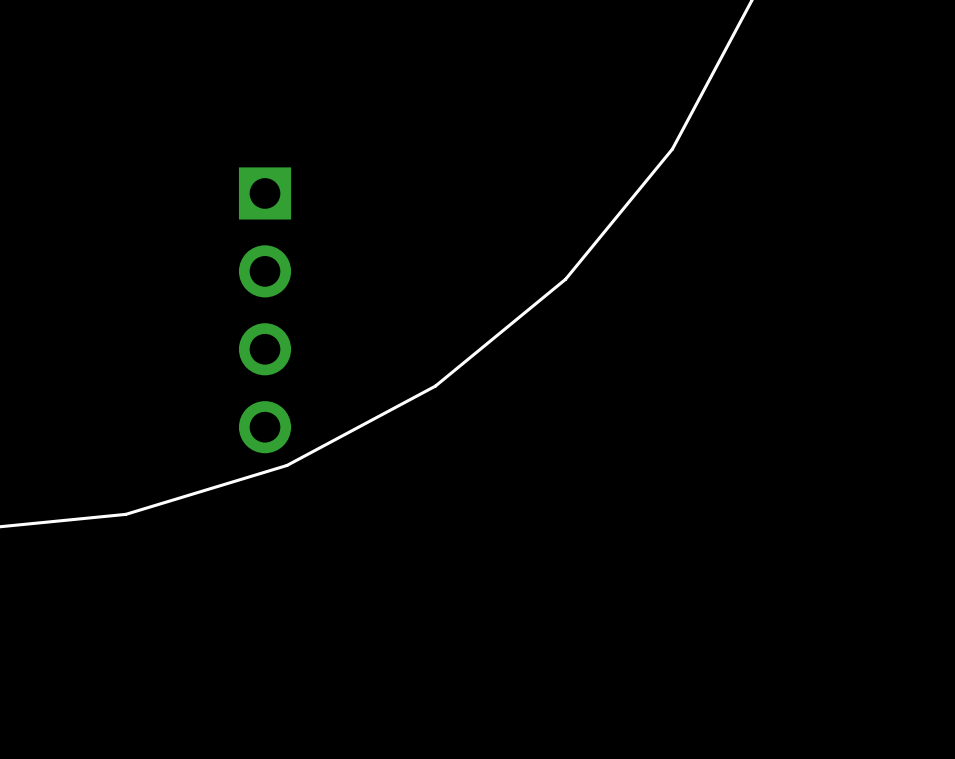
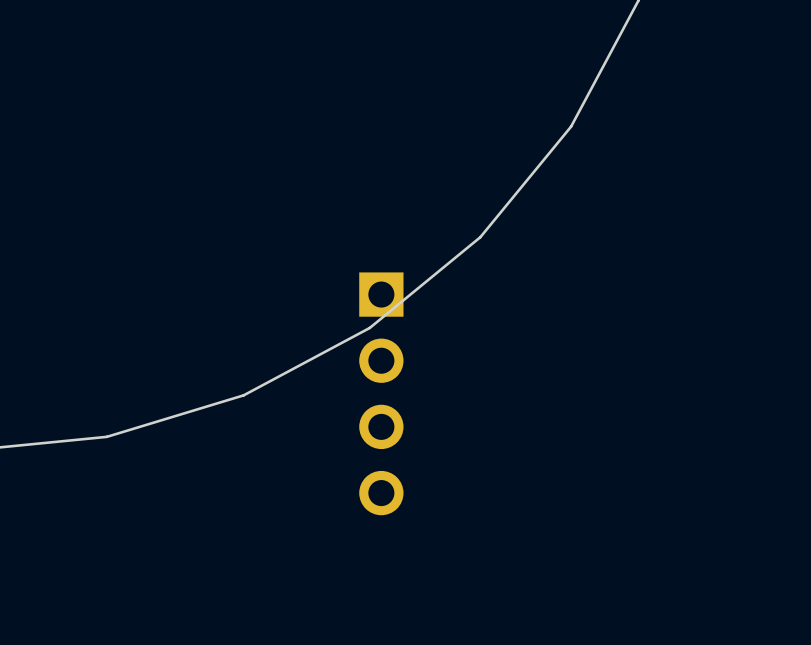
part position: (265, 310) -> (381, 393)

